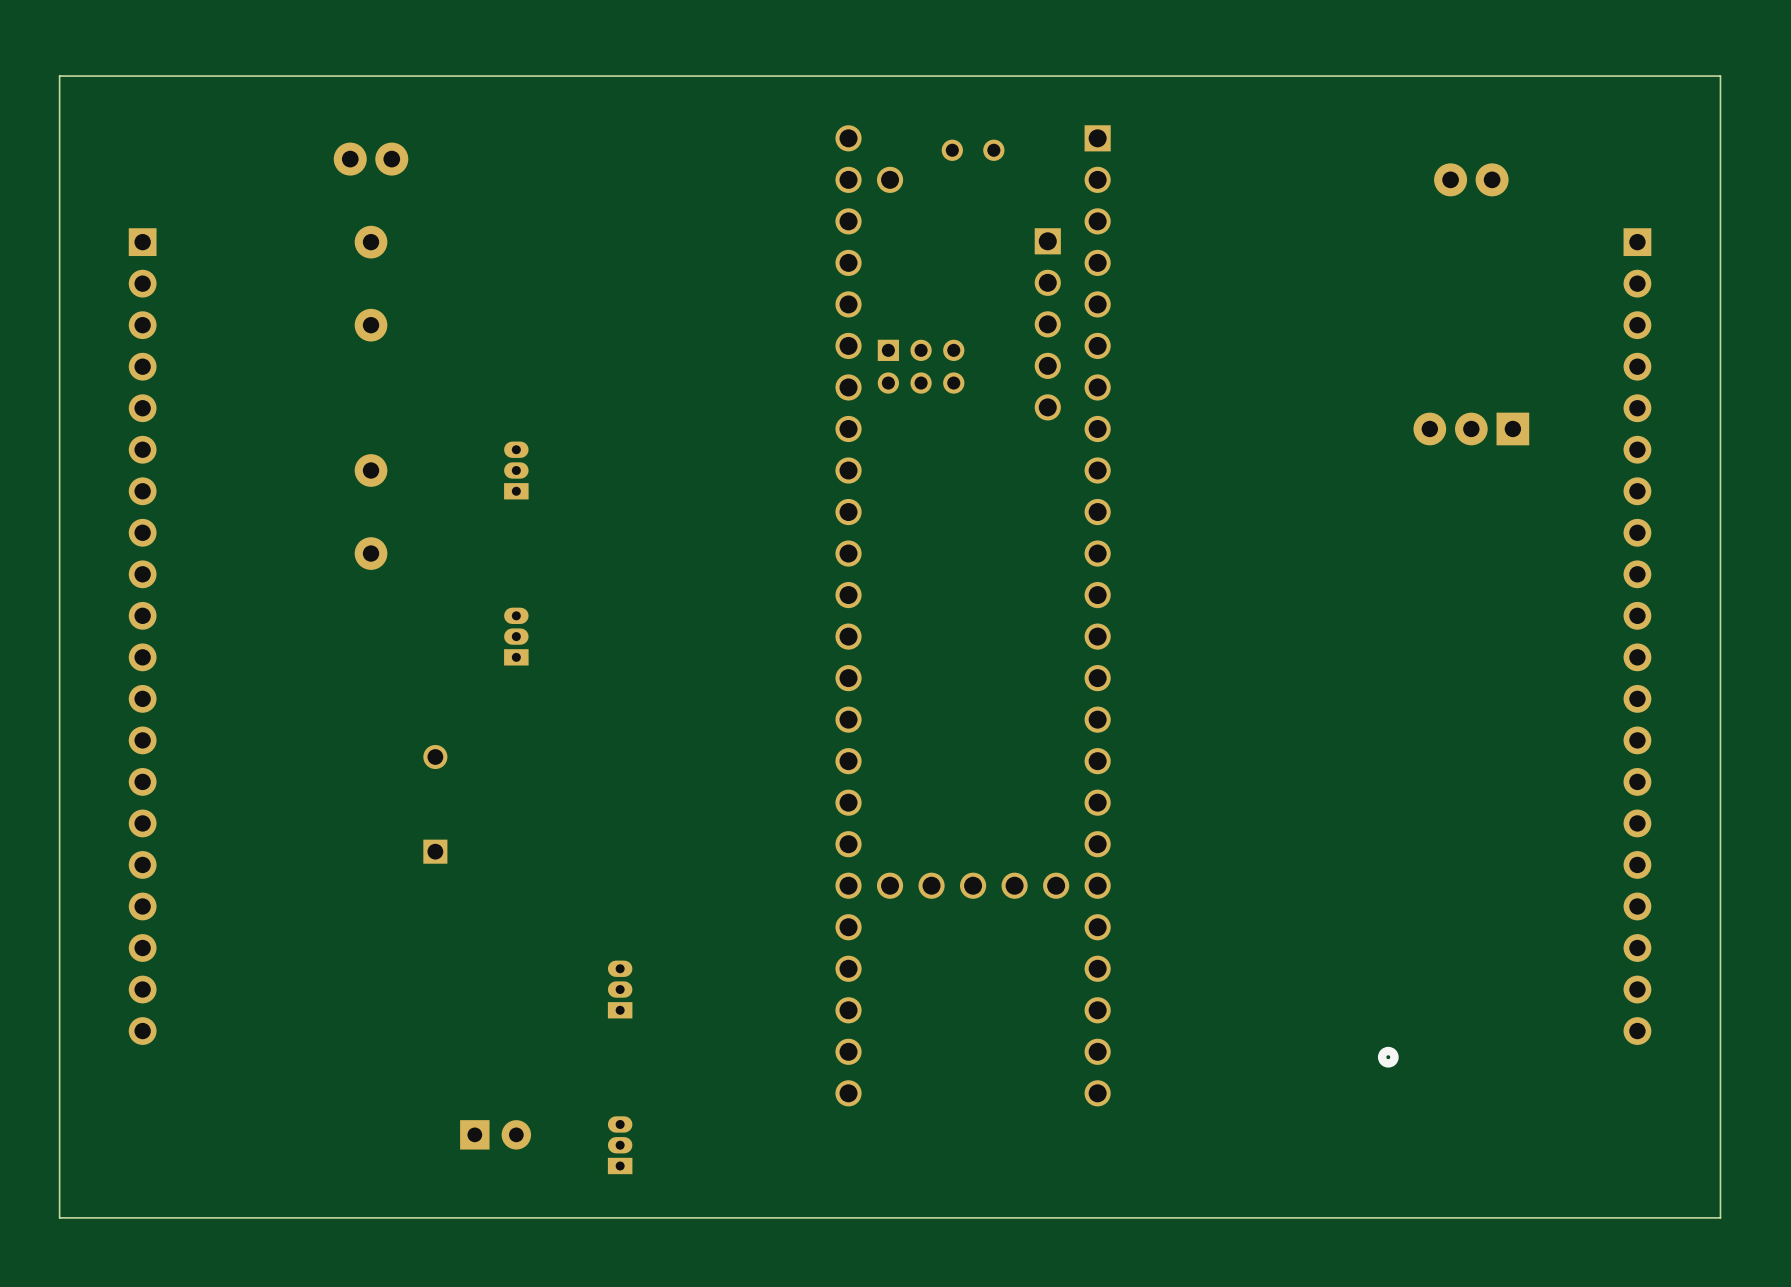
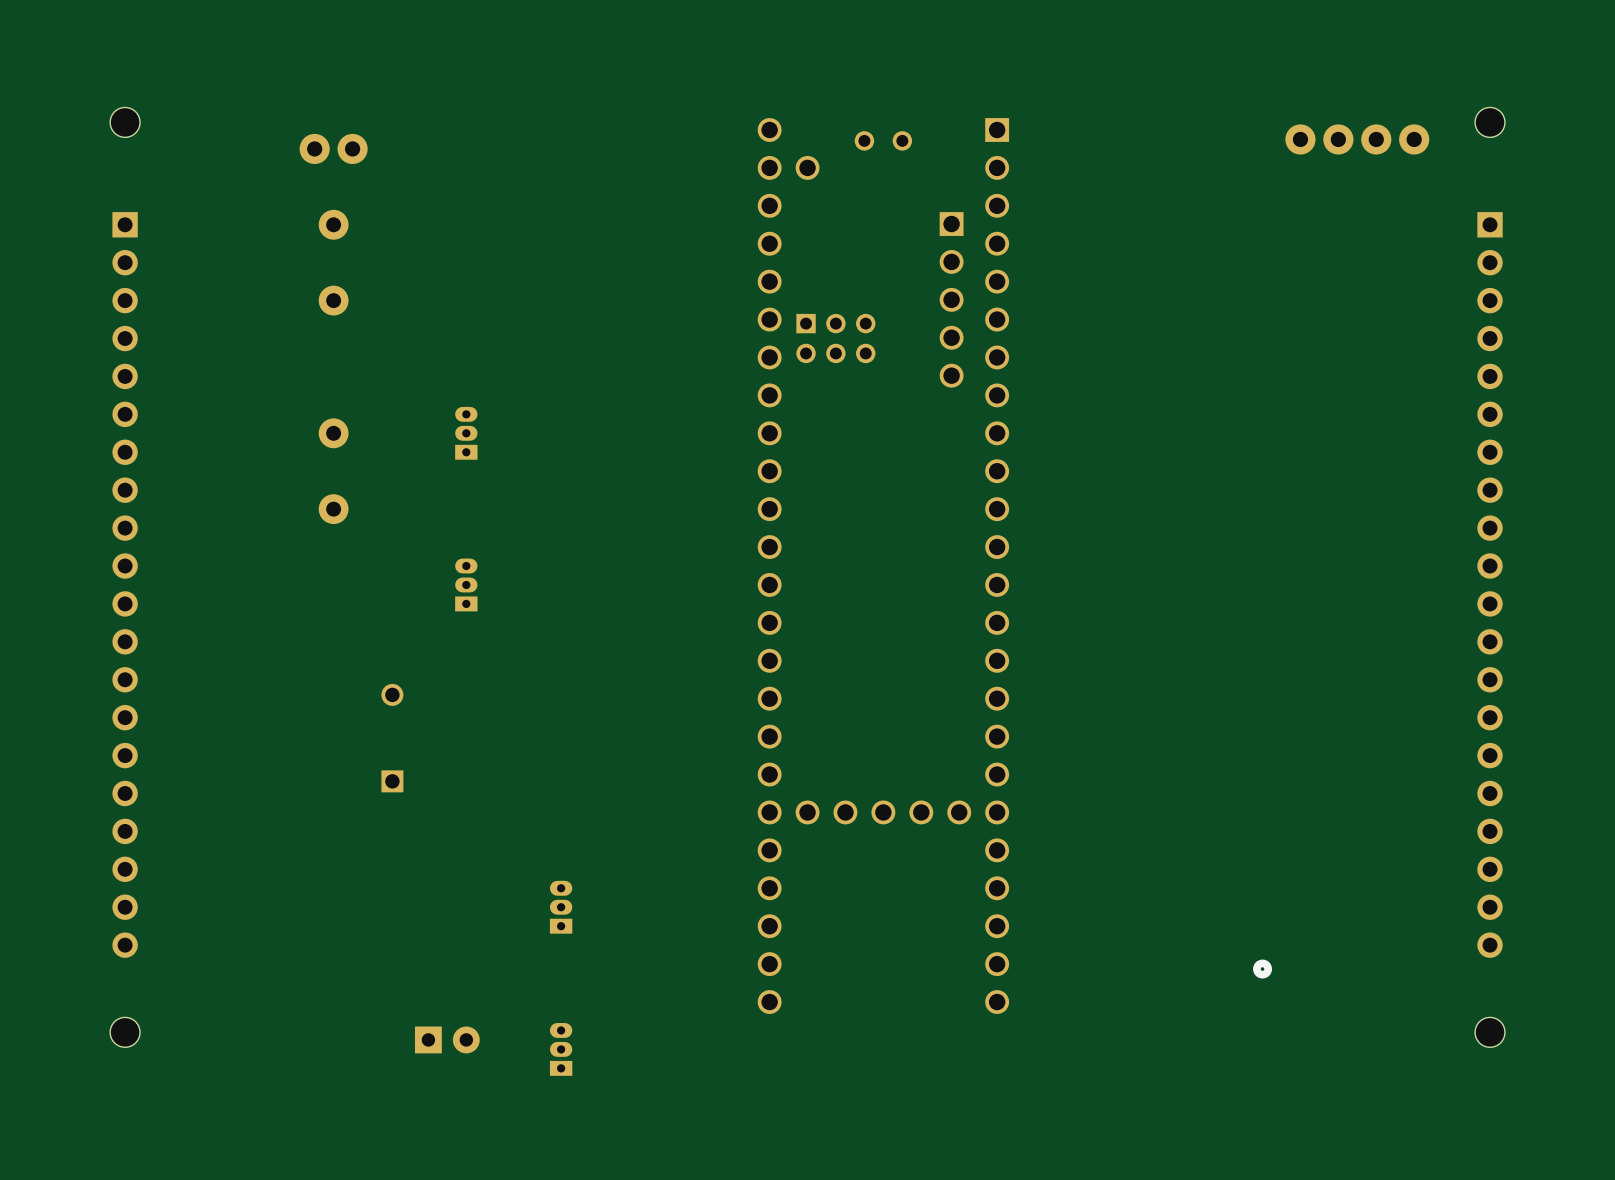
board edge: (1720, 76) (59, 76) (59, 1217) (1720, 1217) (1720, 76) -> none
part: none -> (125, 122)
part: none -> (1490, 122)
part: none -> (1357, 139)
part: (1471, 179) -> none
part: (1471, 428) -> none
part: none -> (125, 1032)
part: none -> (1490, 1032)

